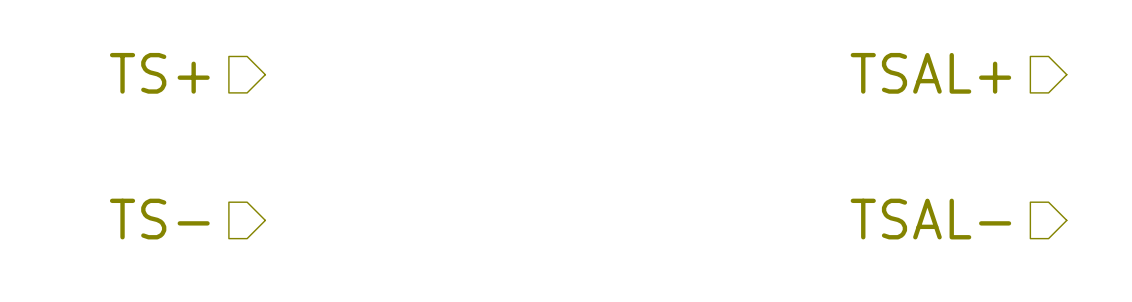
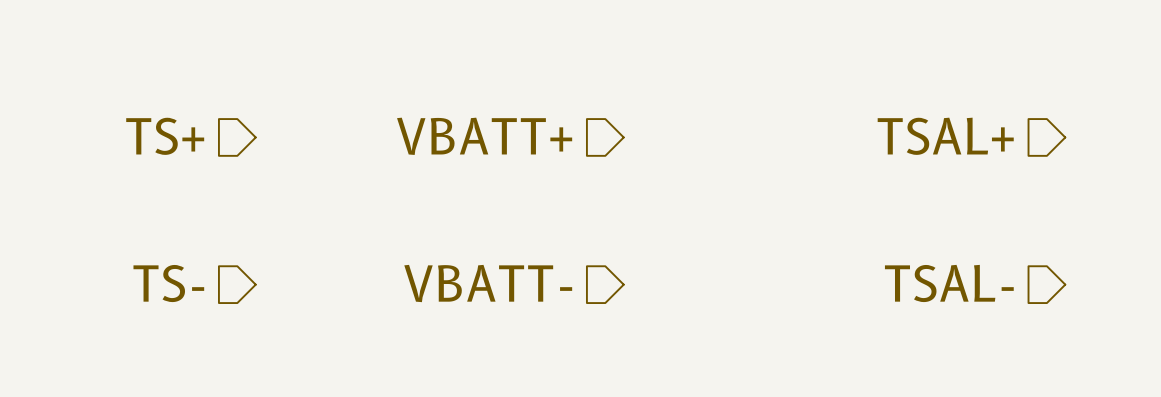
hierarchical label: none -> VBATT+ (484, 136)
hierarchical label: none -> VBATT- (488, 283)

